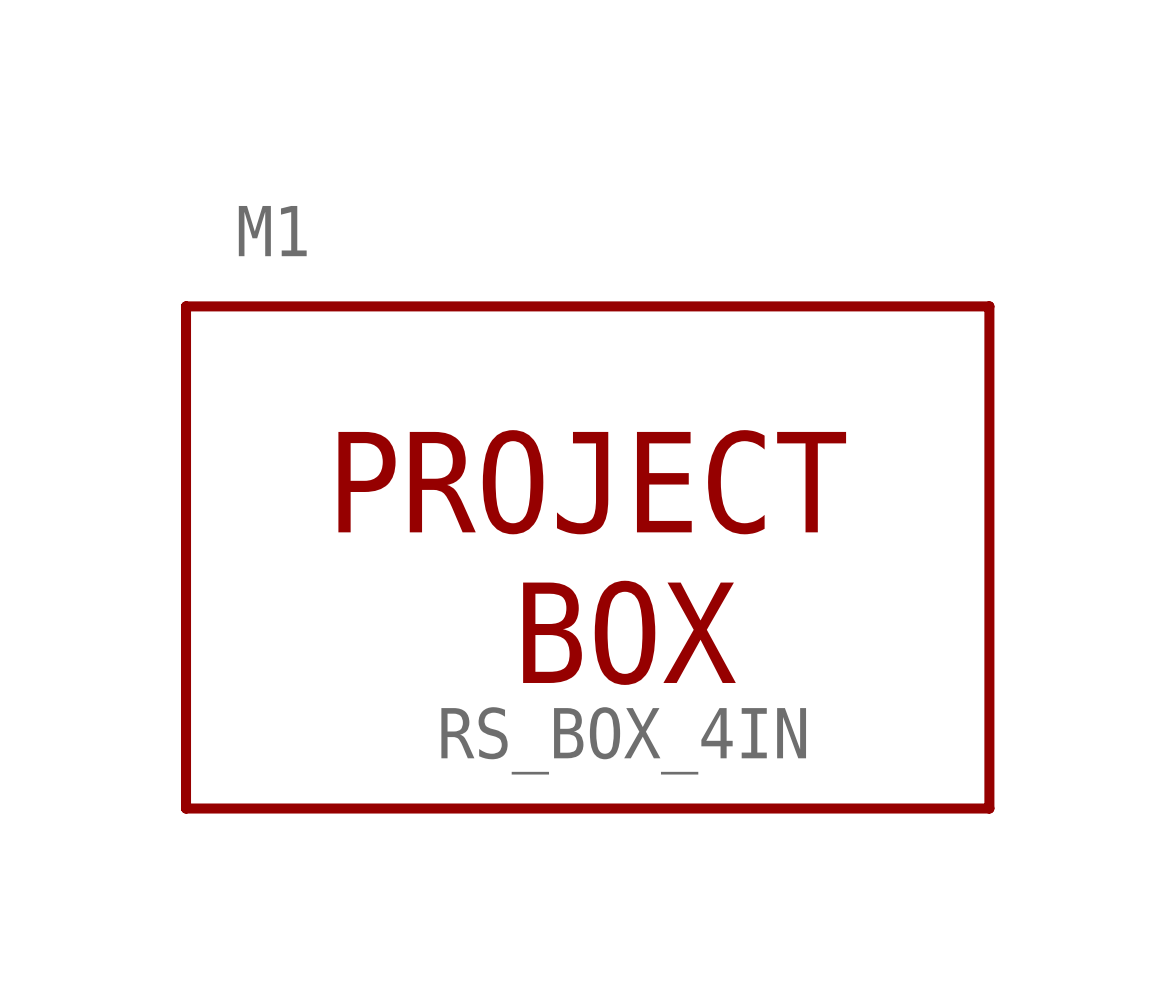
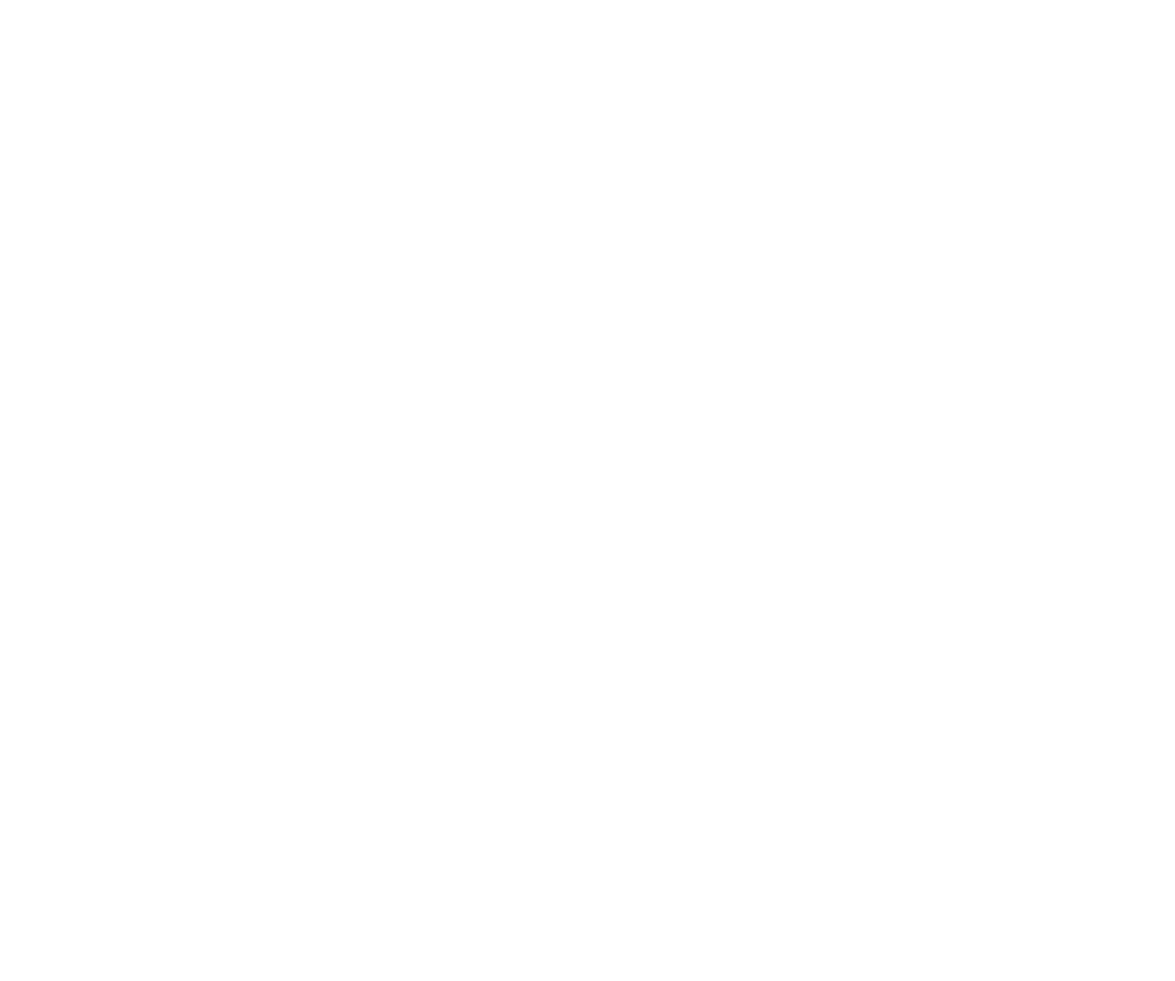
M1: RS_BOX_4IN (587, 557) -> none

